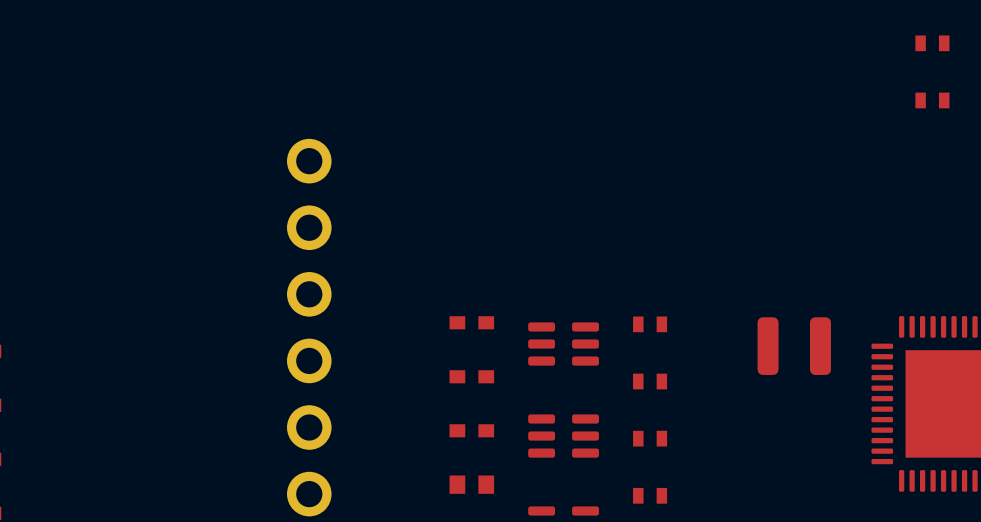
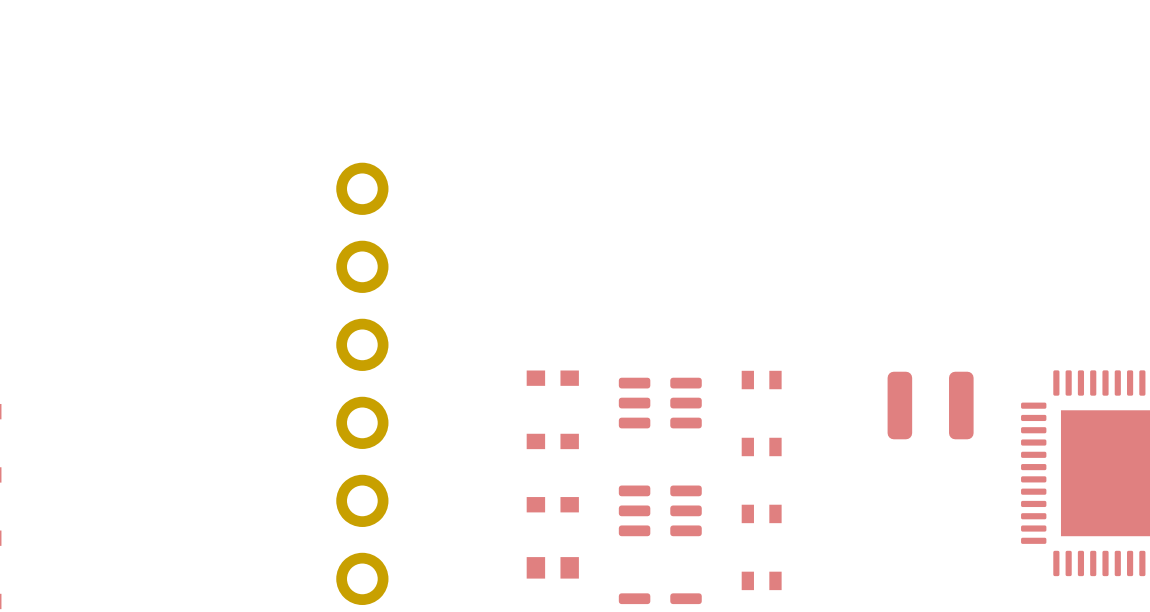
part: (932, 43) -> none
part: (932, 100) -> none

